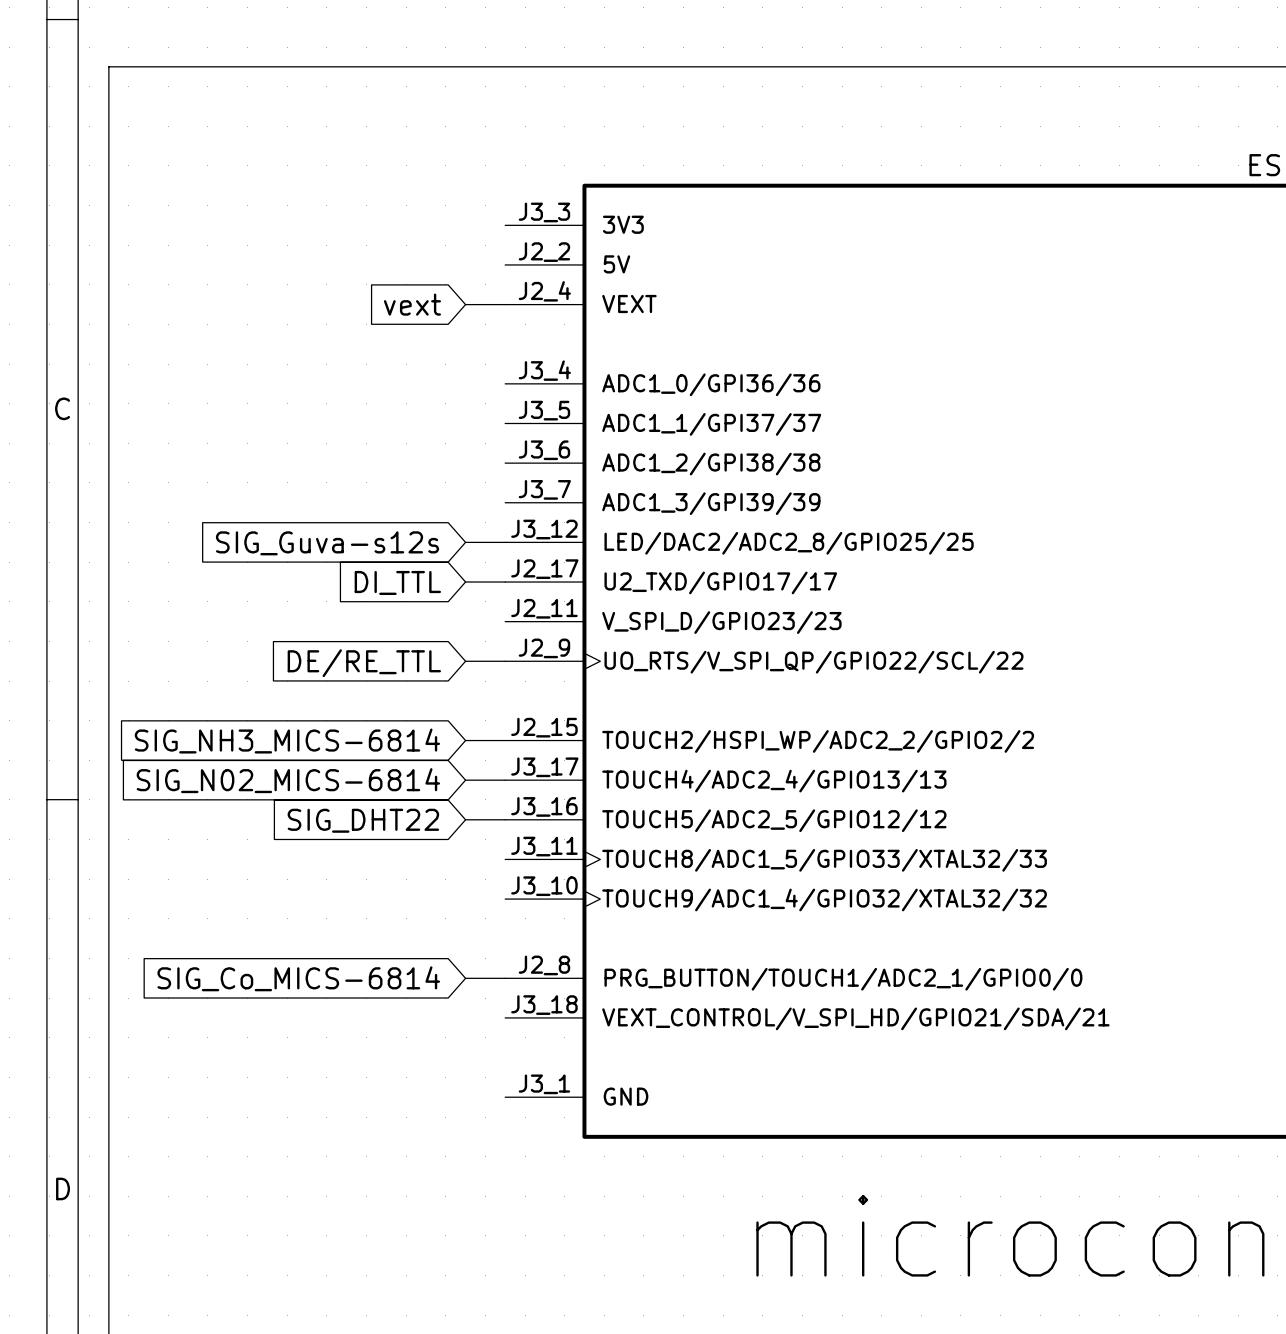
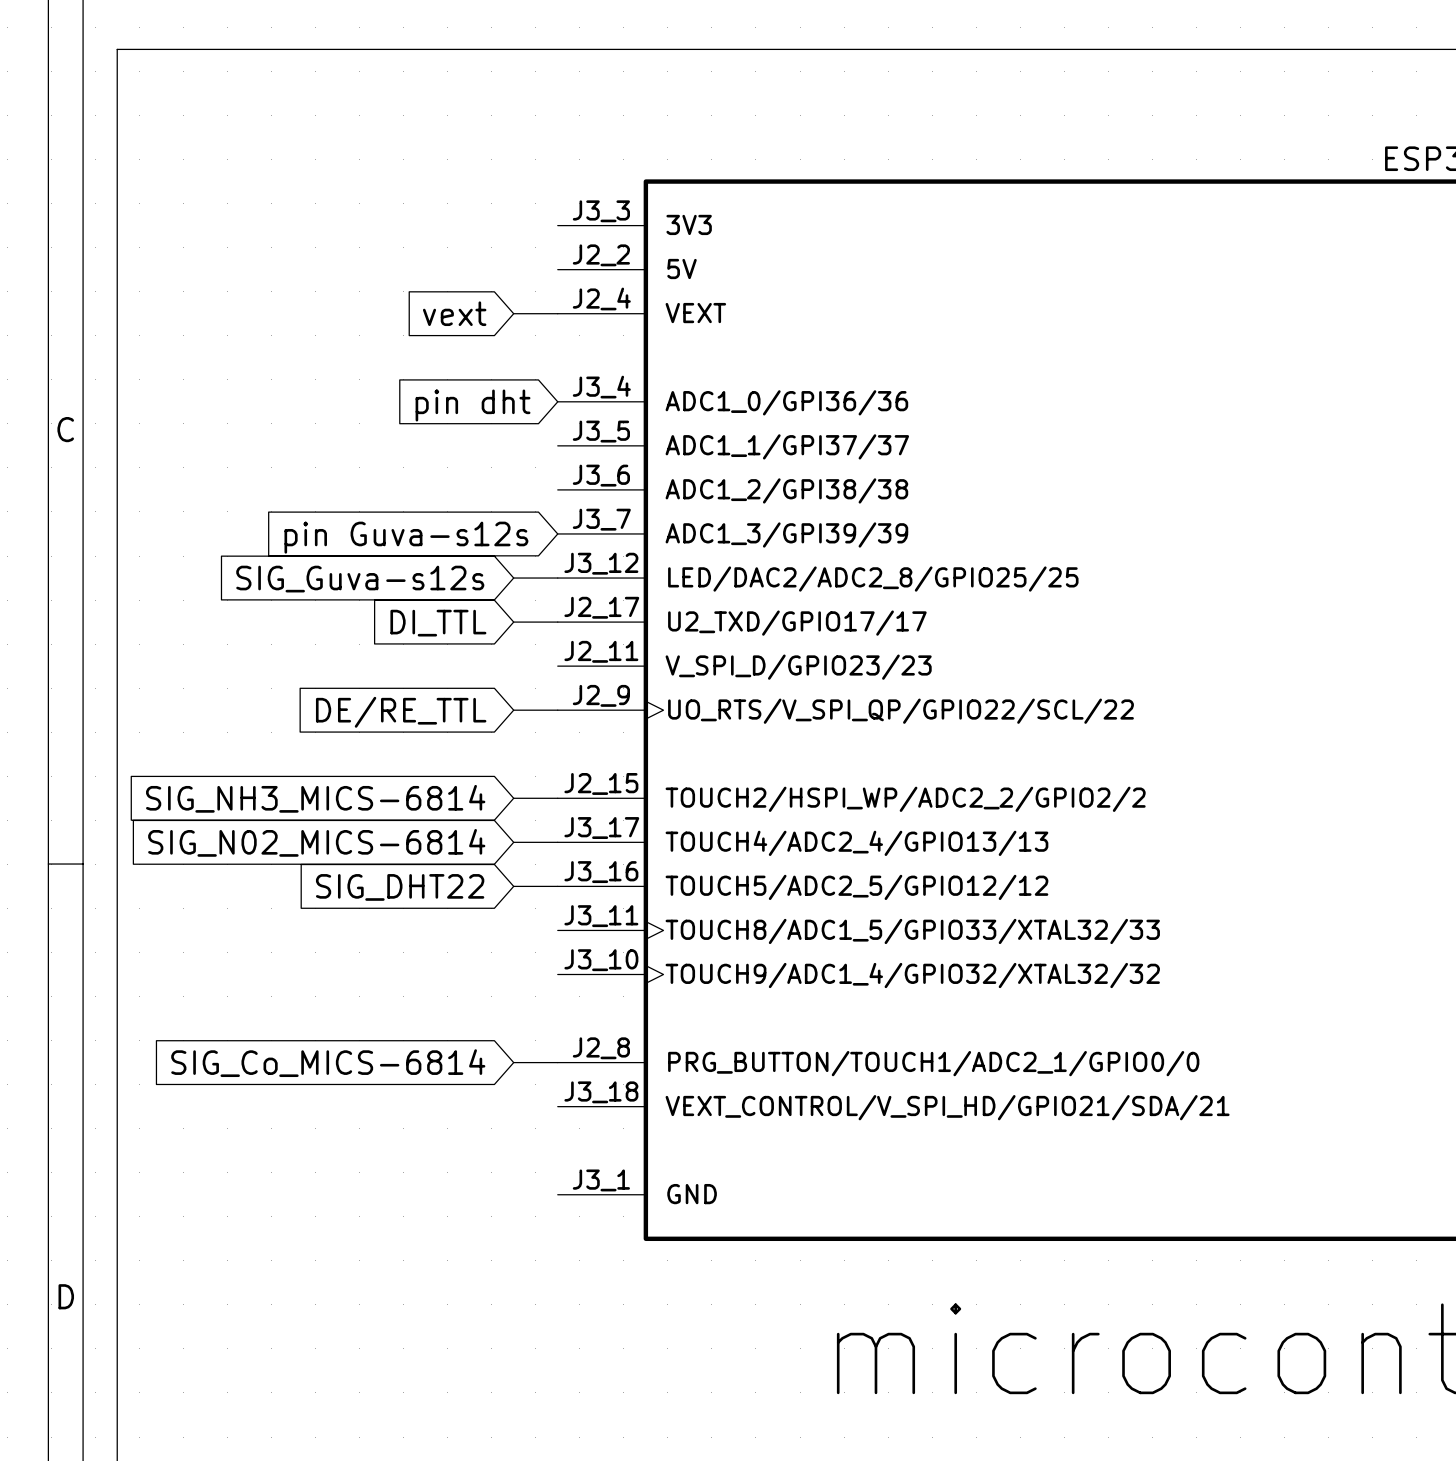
global label: none -> pin dht (473, 405)
global label: none -> pin Guva-s12s (406, 537)

